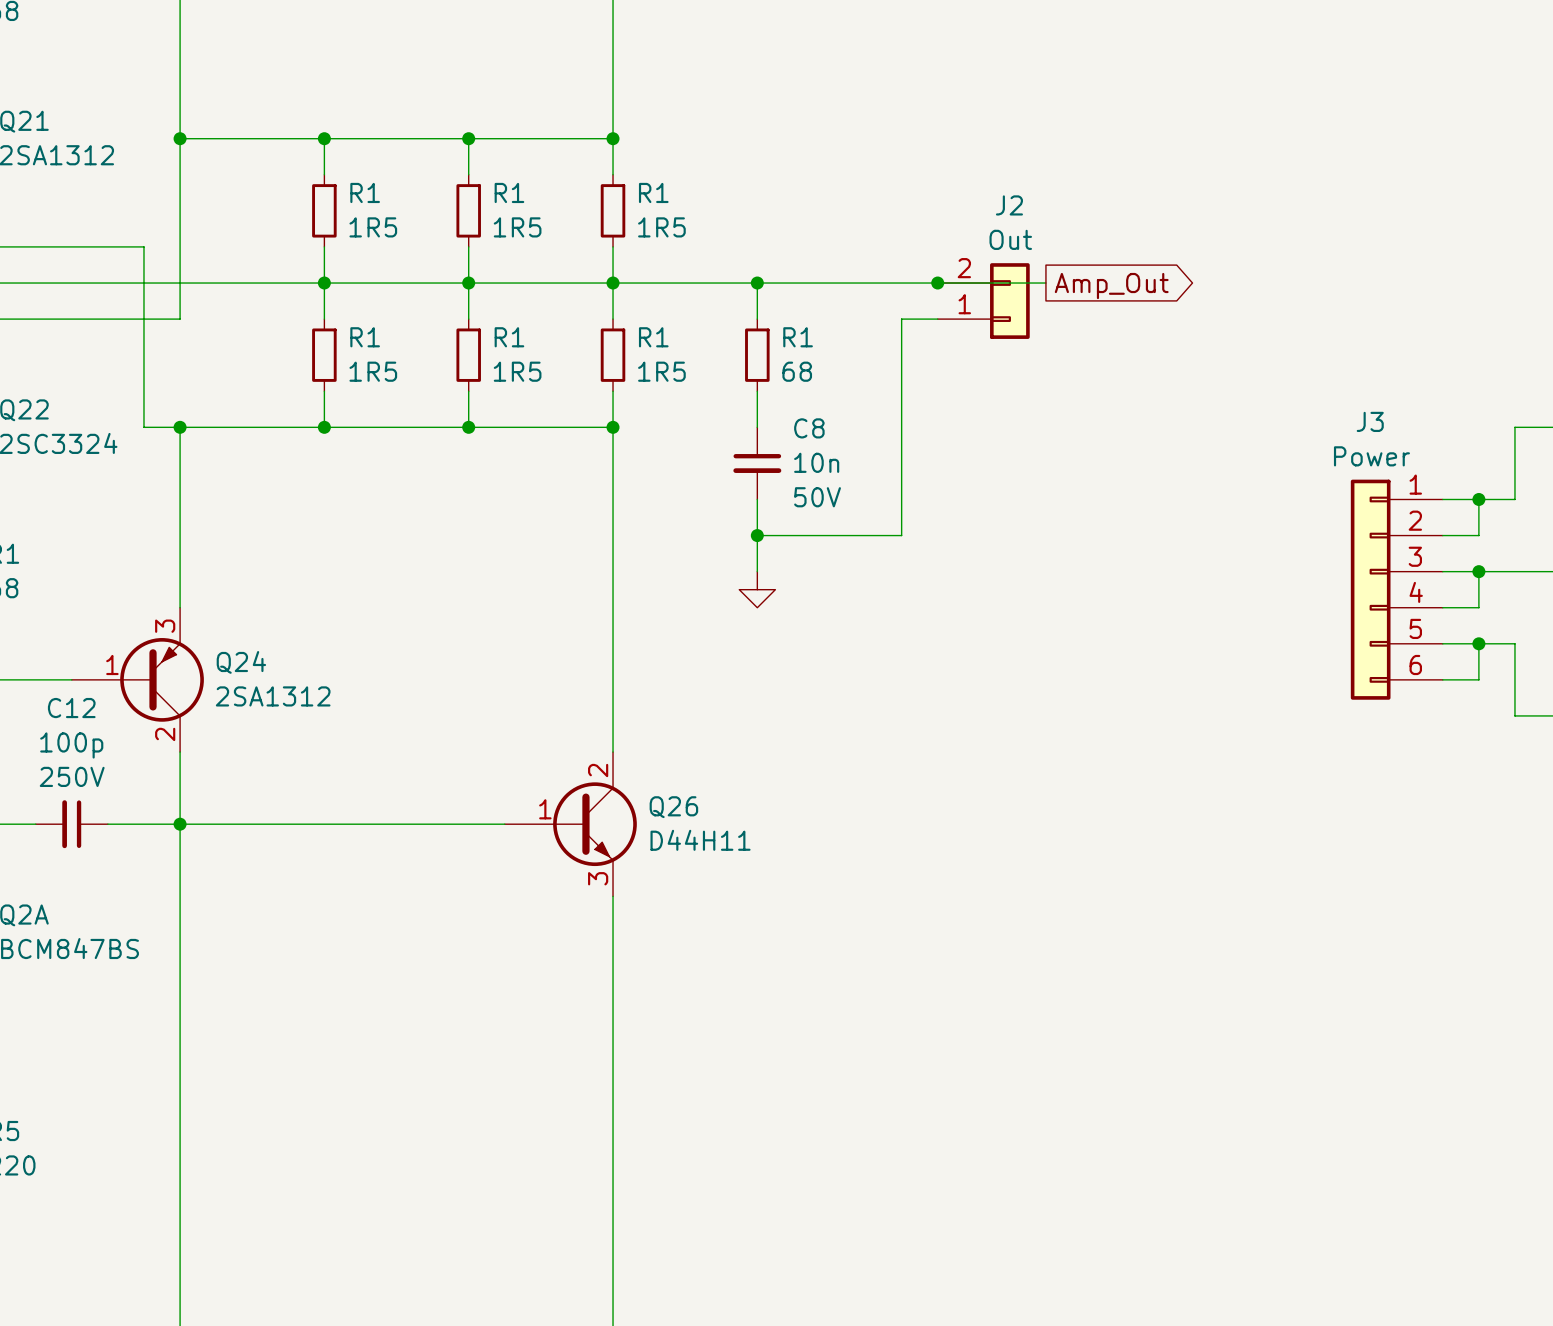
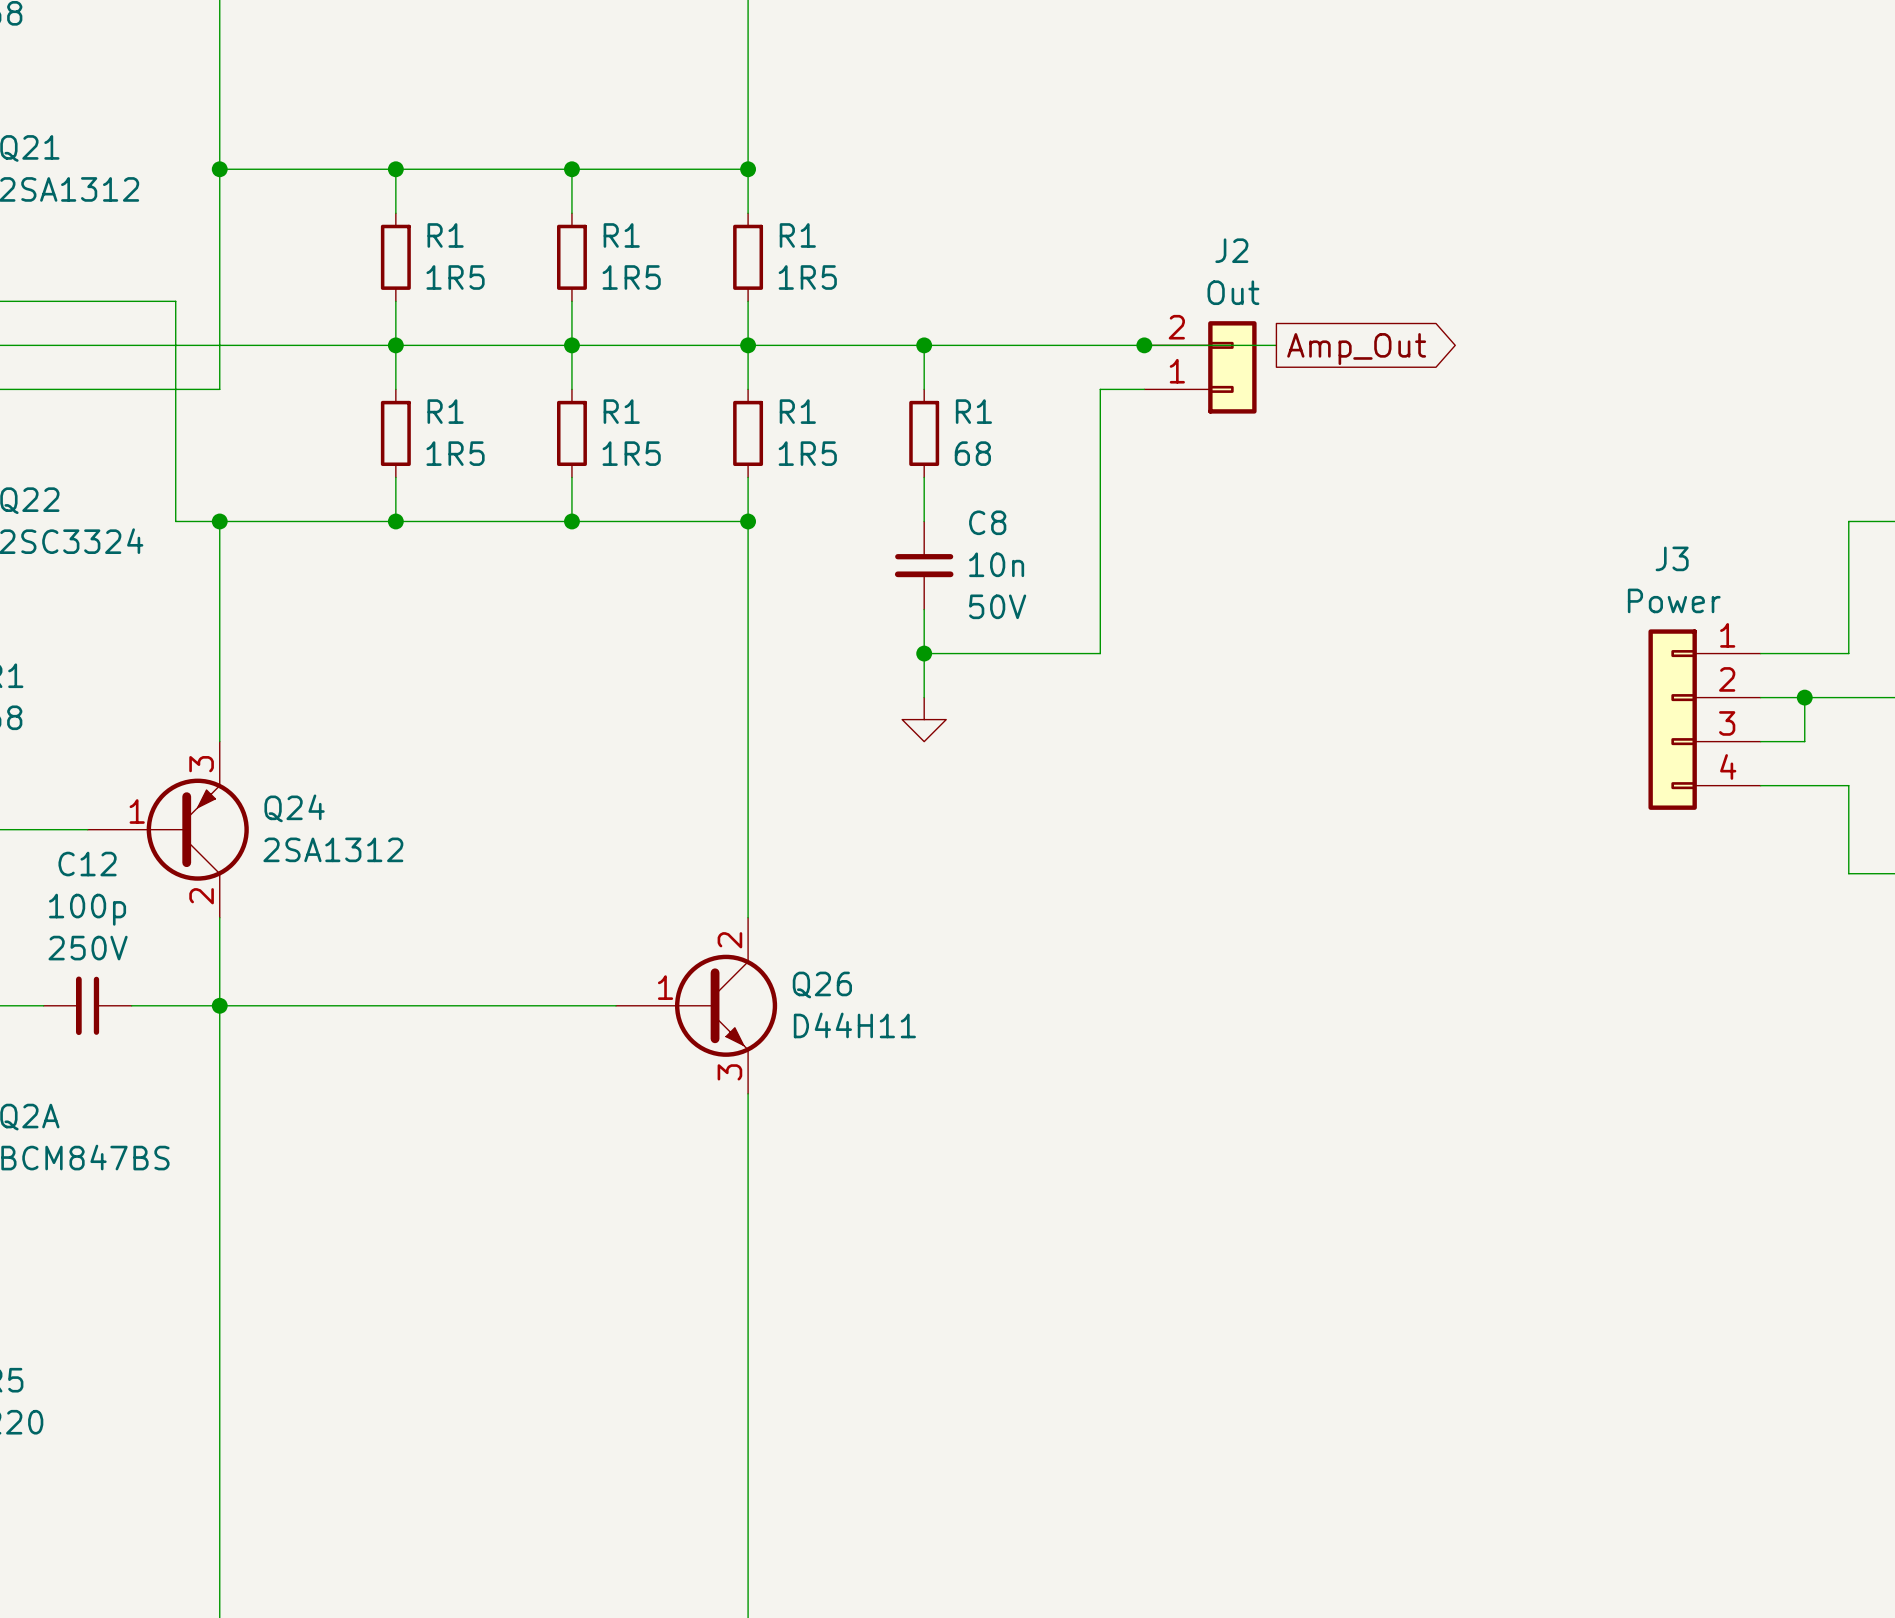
J3 name position: J3 (1370, 421) -> J3 (1672, 558)
J3 value position: Power (1371, 456) -> Power (1674, 600)
J3 symbol: [1350, 479, 1443, 700] -> [1648, 629, 1761, 810]
wire: (1442, 499) (1514, 499) -> none
wire: (1478, 499) (1478, 535) -> (1848, 609) (1848, 653) (1804, 653)
junction: (1478, 499) -> none
wire: (1478, 643) (1478, 679) (1442, 679) -> none
junction: (1478, 643) -> none

